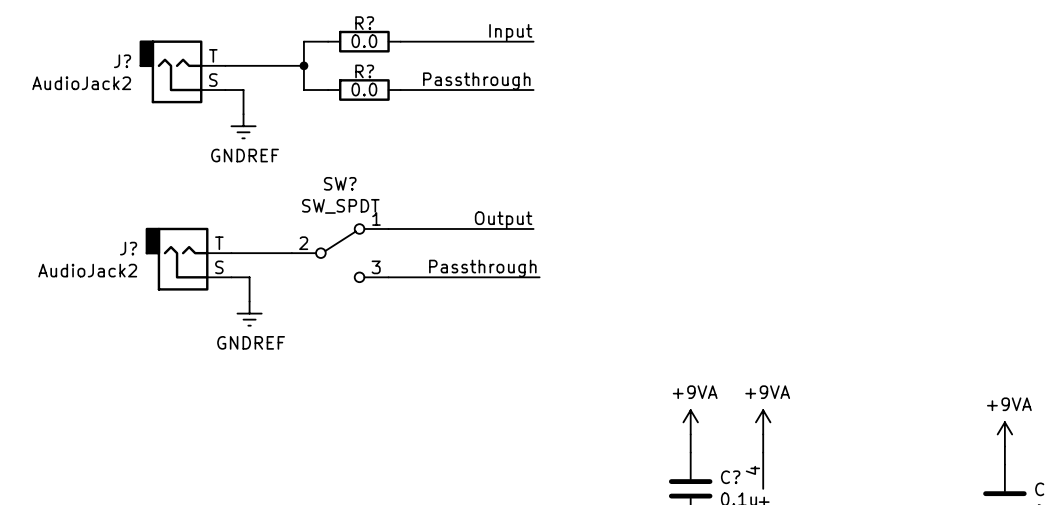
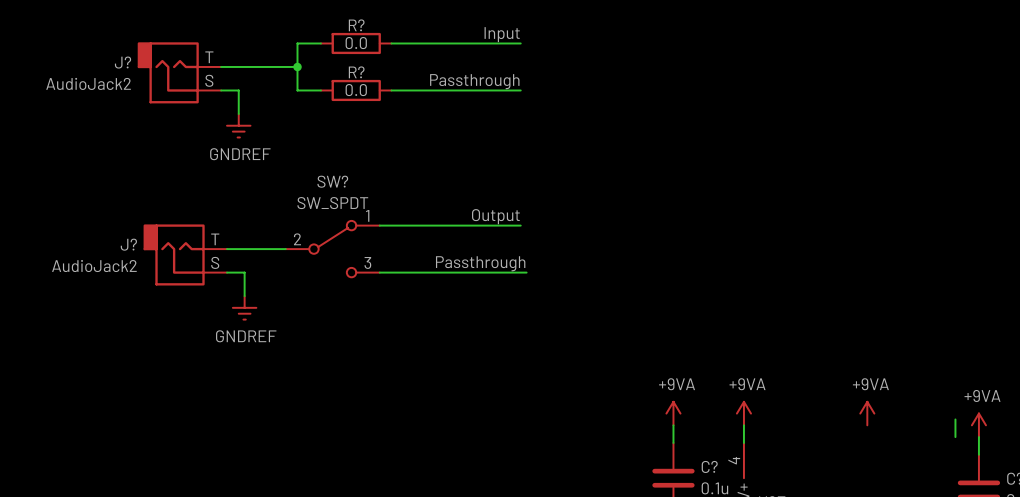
power symbol: none -> +9VA (867, 413)
wire: none -> (955, 419) (955, 437)

